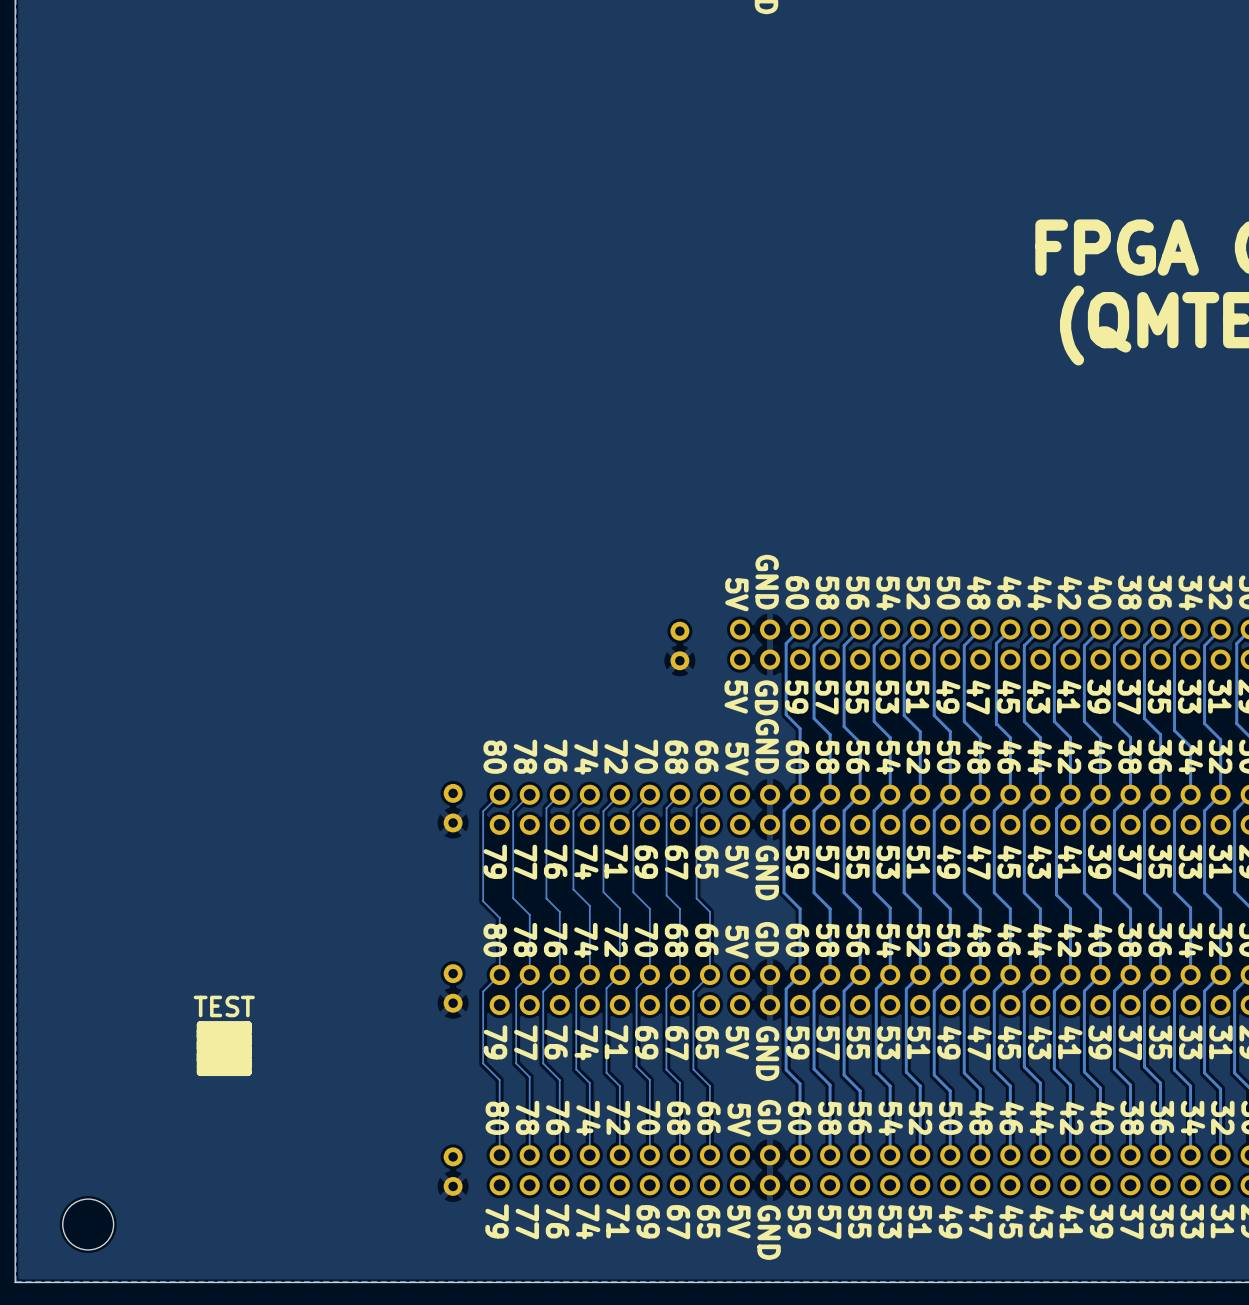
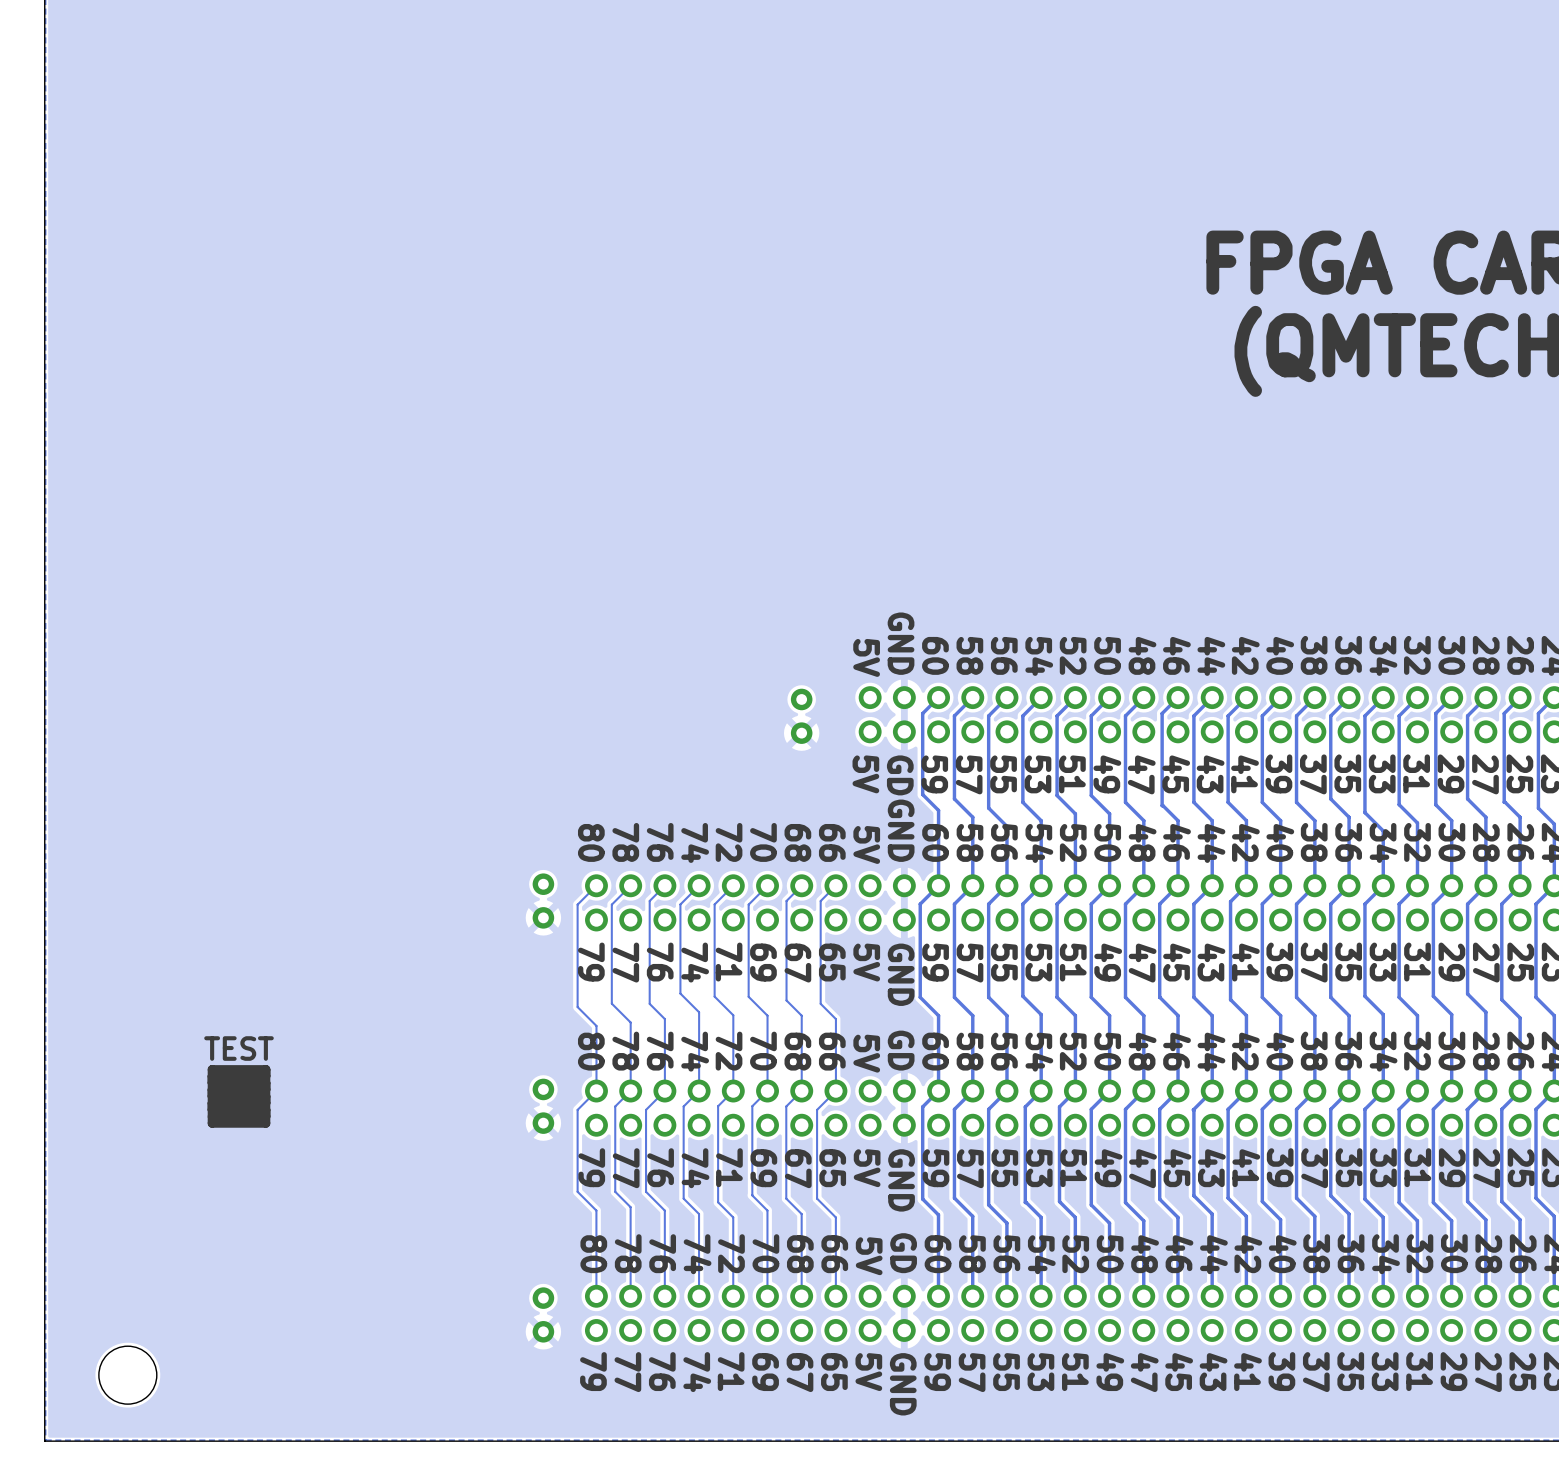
TEST position: (224, 1048) -> (239, 1096)

